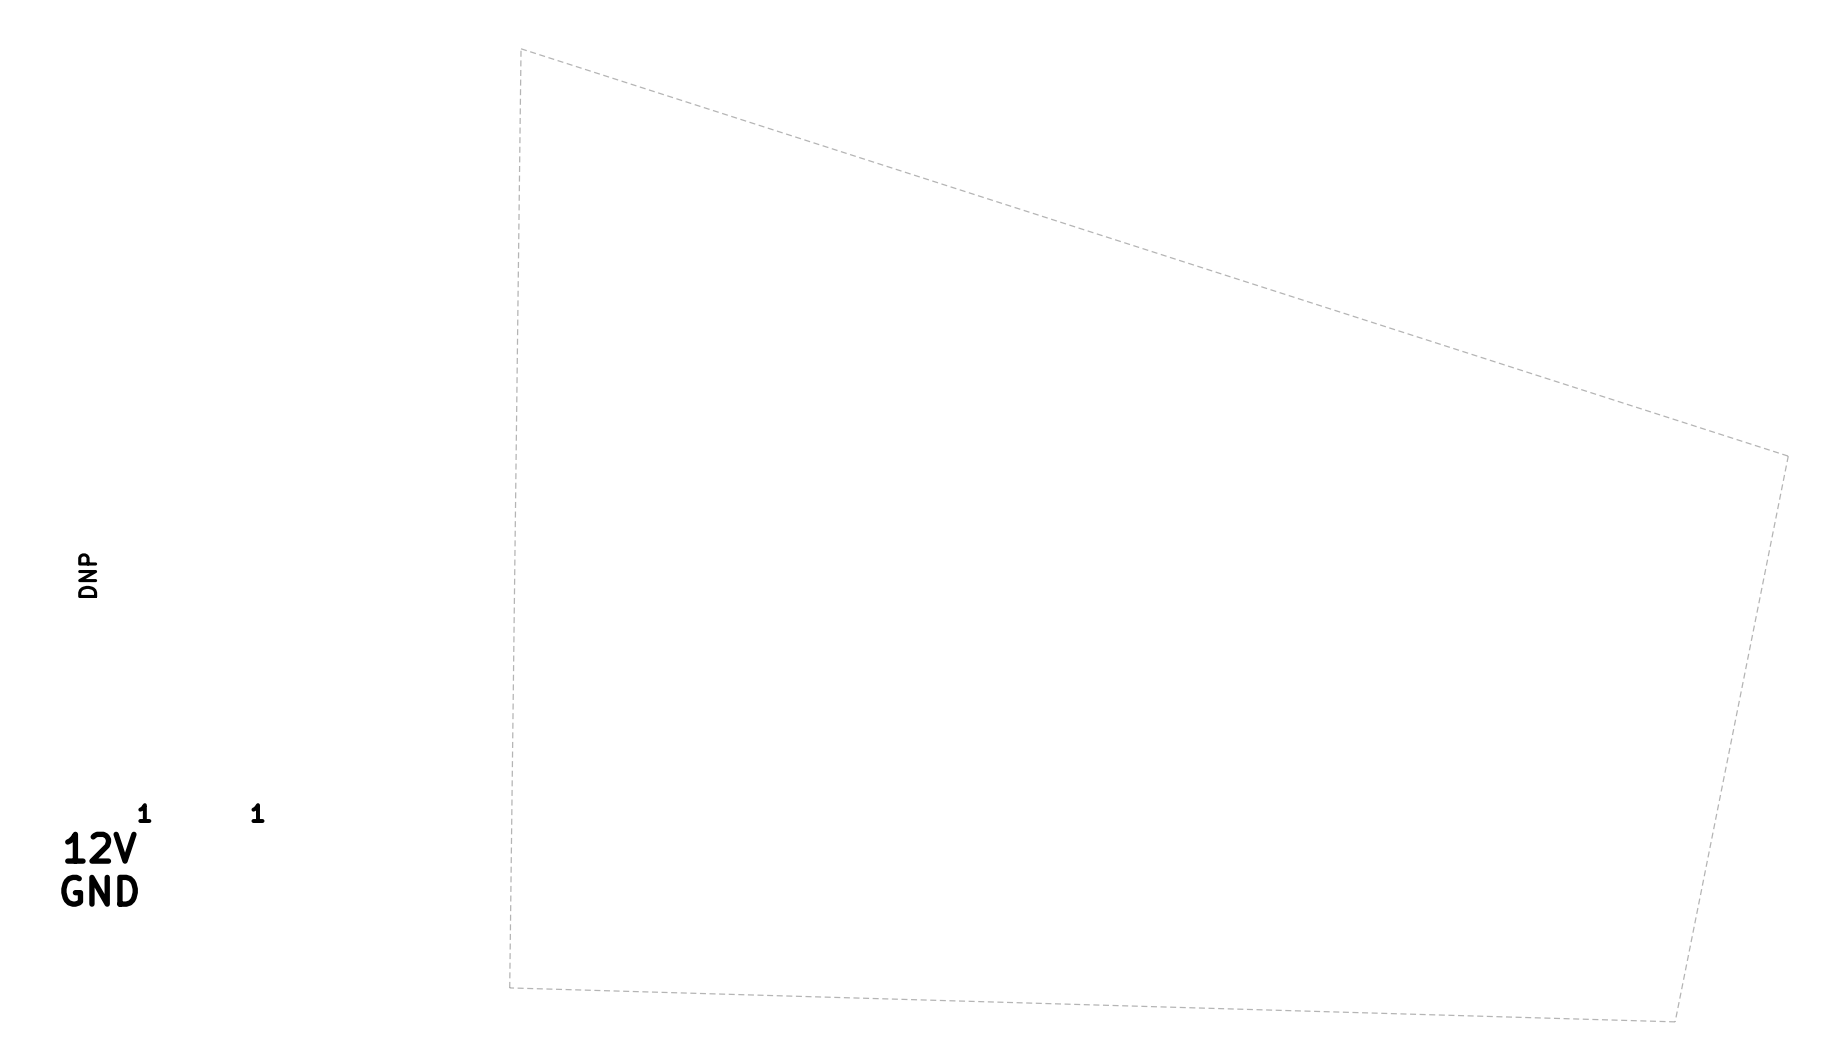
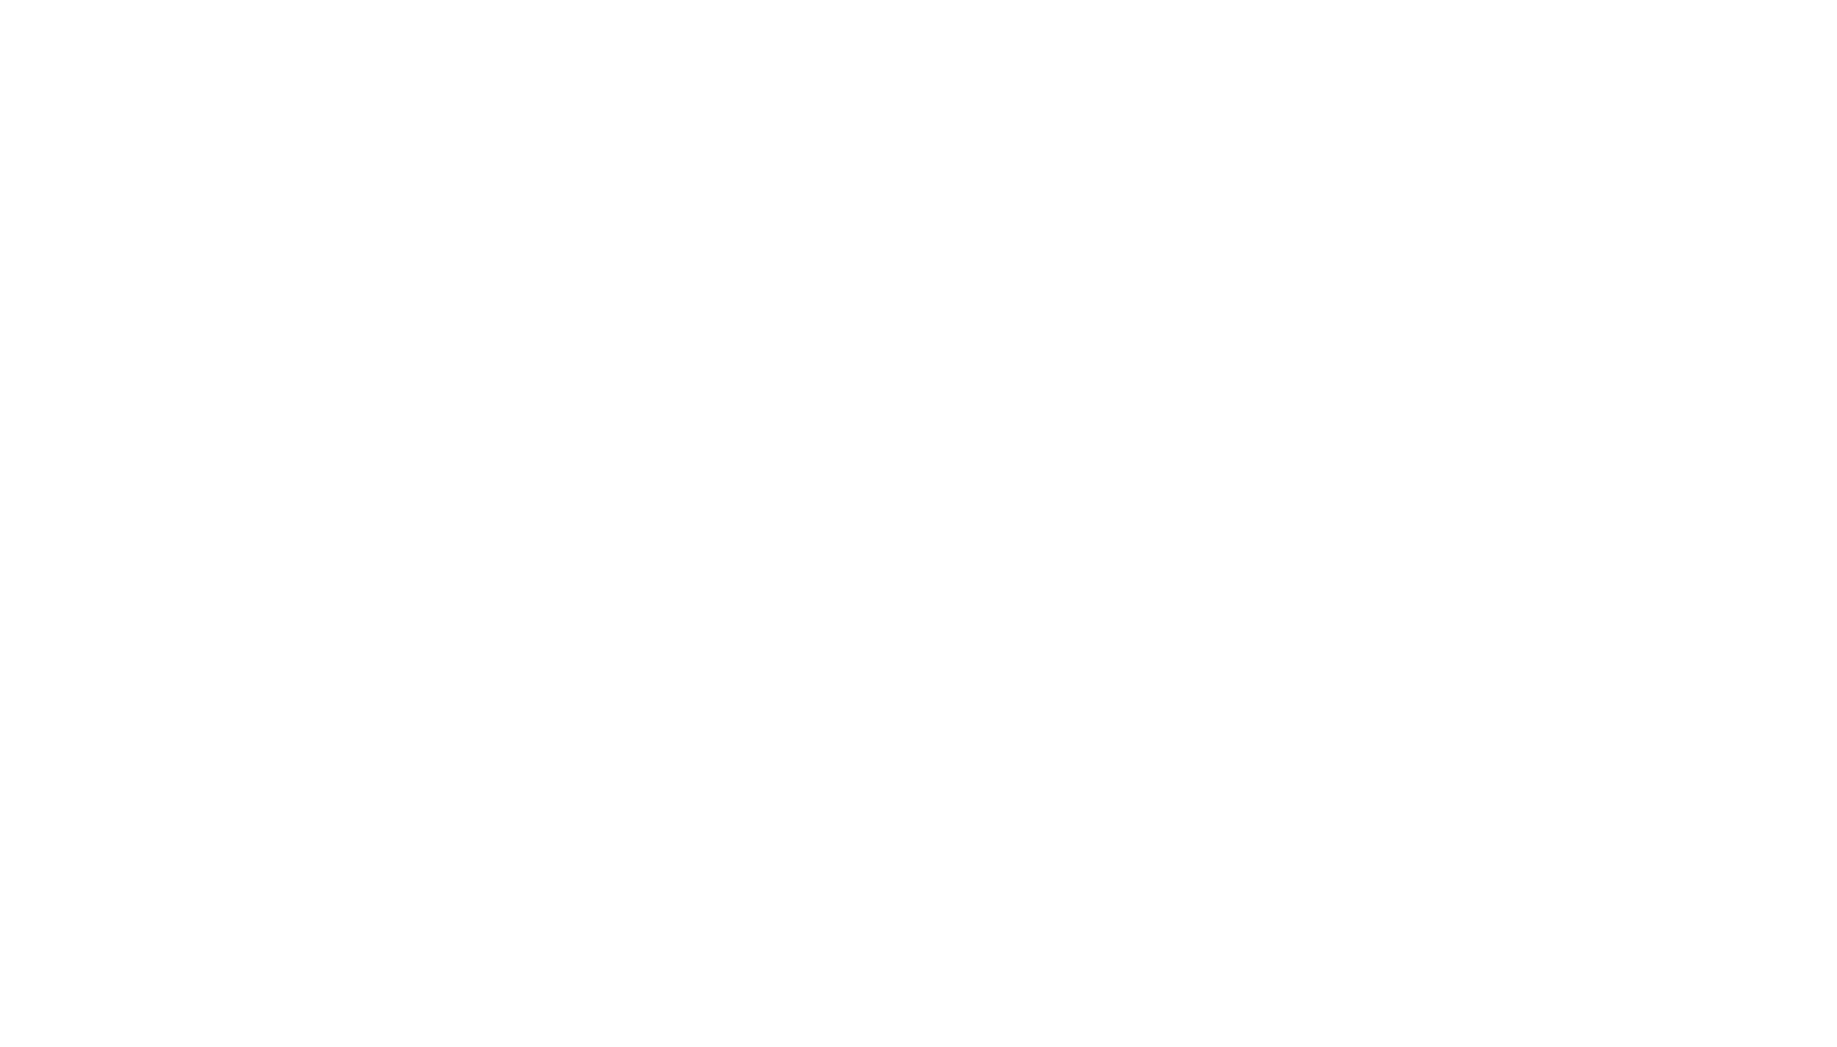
zone outline: (521, 48) (1788, 456) (1675, 1021) (509, 987) (521, 48) -> none
text: DNP (87, 575) -> none
text: 1 (144, 813) -> none
text: 1 (257, 813) -> none
text: 12V (100, 847) -> none
text: GND (99, 890) -> none

